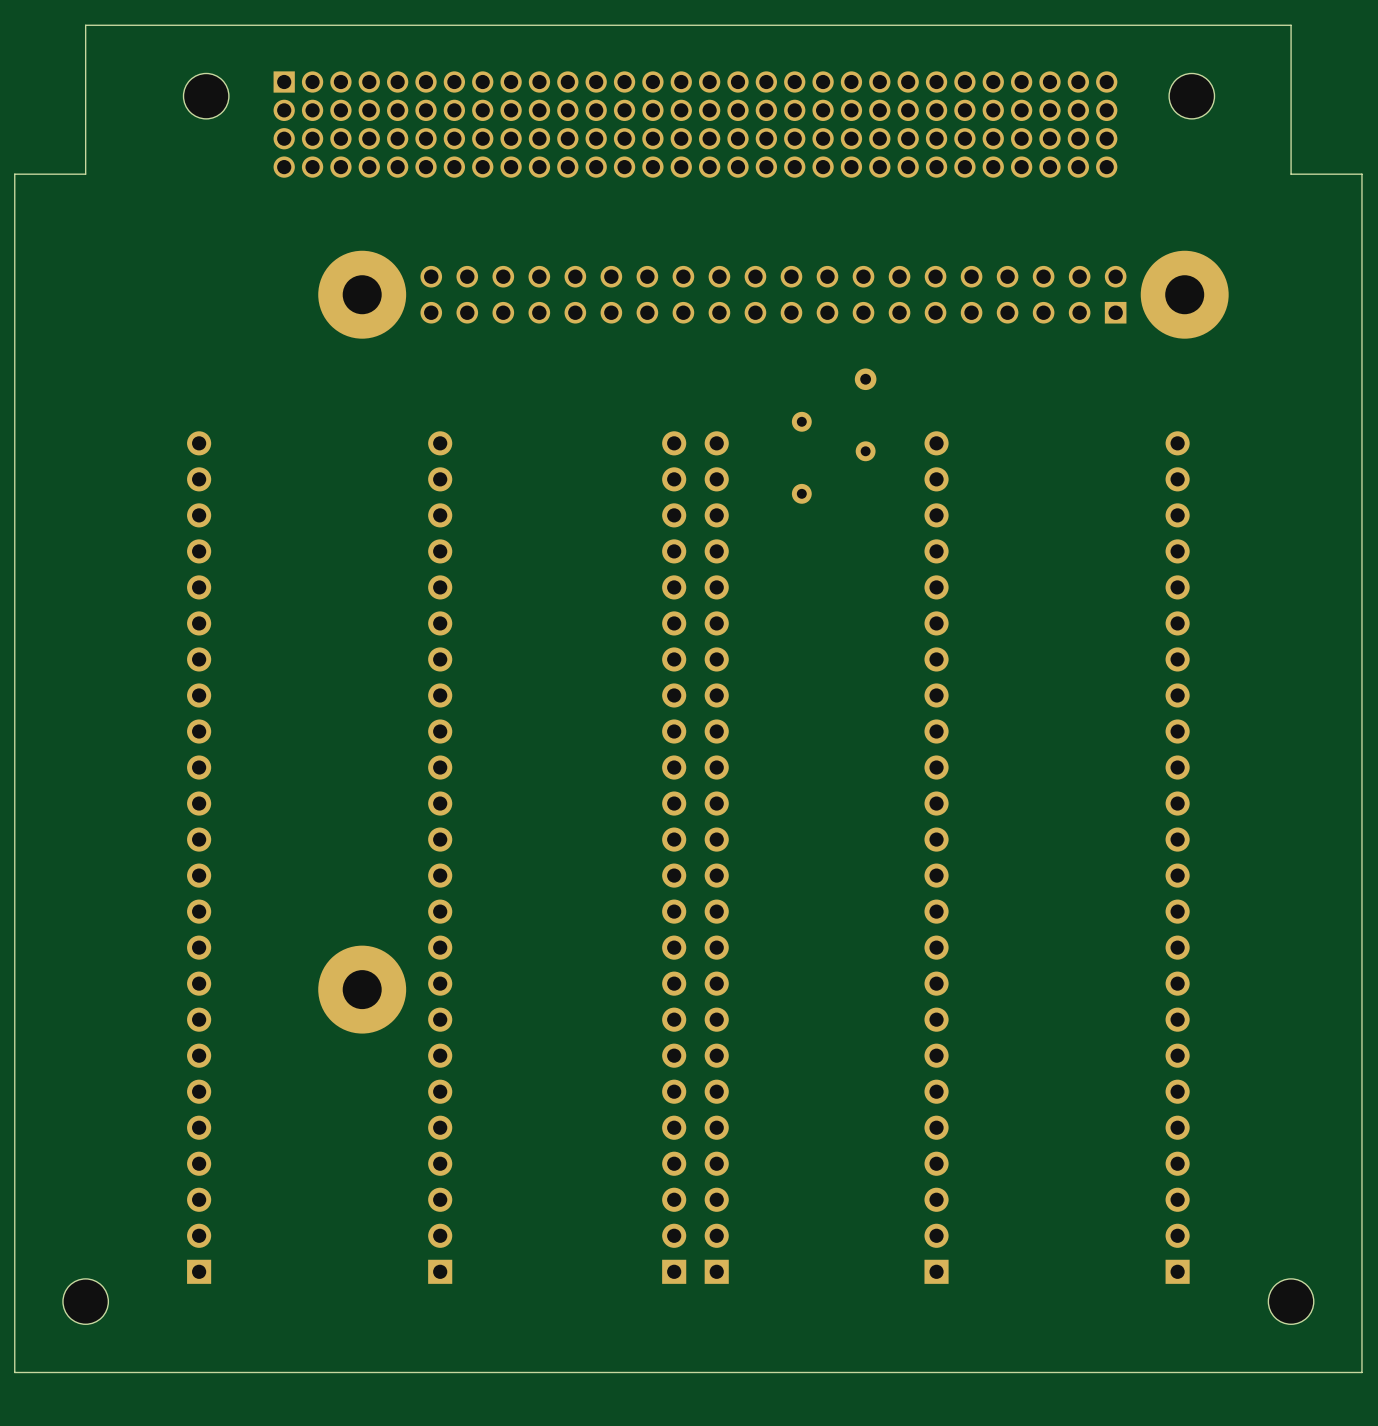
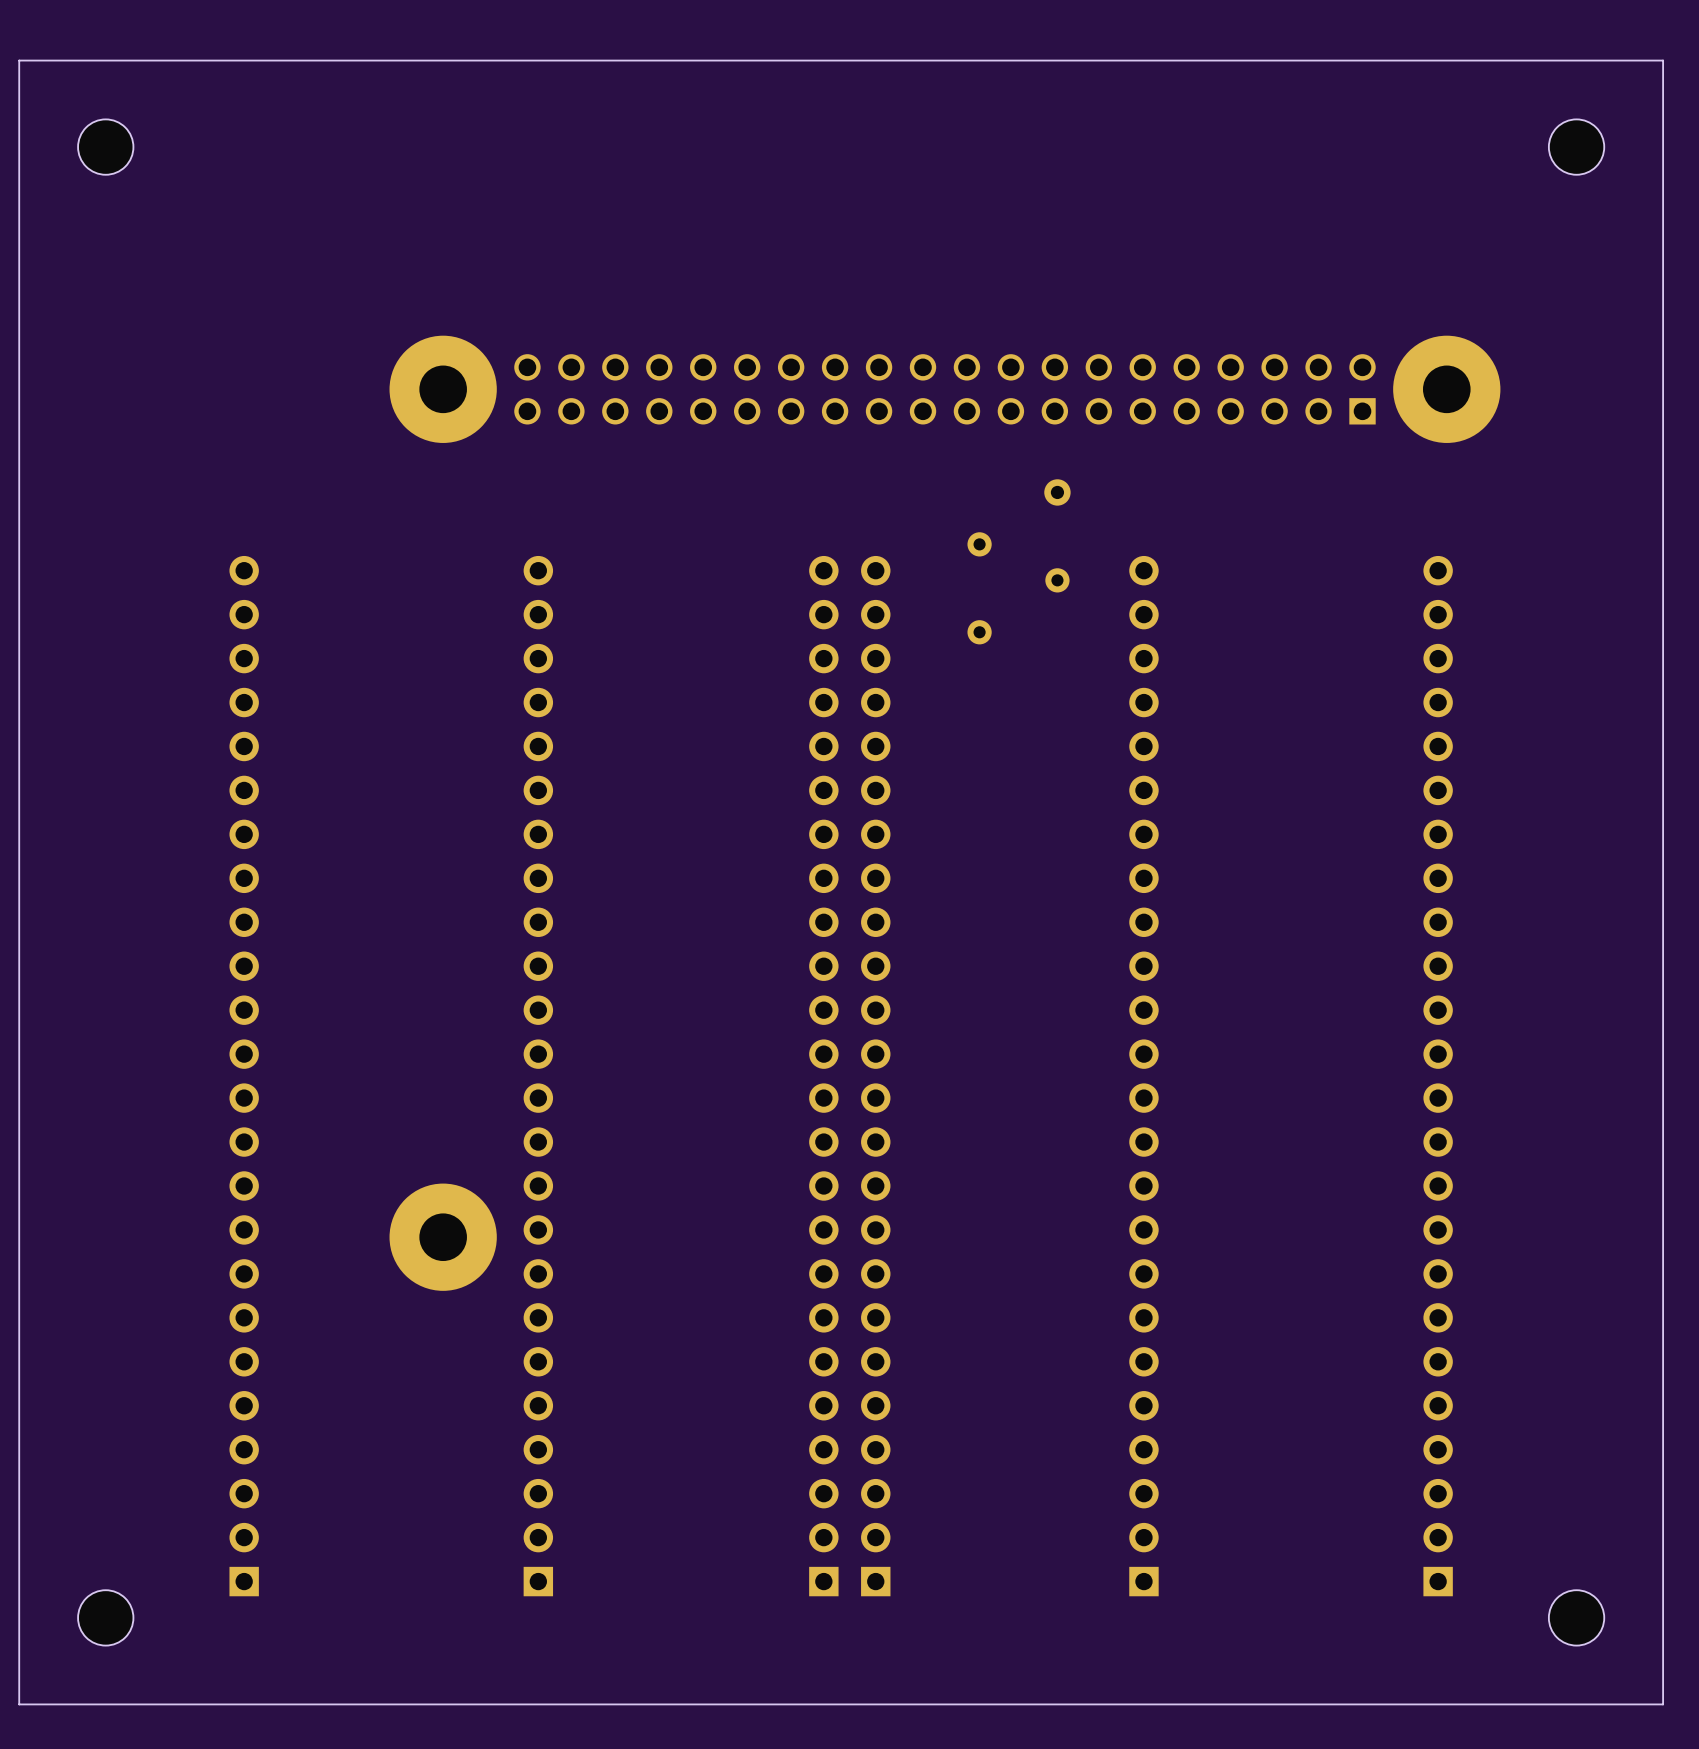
board edge: (85, 25) (85, 174) (14, 174) -> (105, 60) (19, 60) (19, 242)
board edge: (1291, 25) (1291, 174) (1361, 174) -> (1576, 60) (1663, 60) (1663, 242)
part position: (206, 96) -> (105, 147)
part position: (1191, 96) -> (1576, 147)
part: (695, 124) -> none

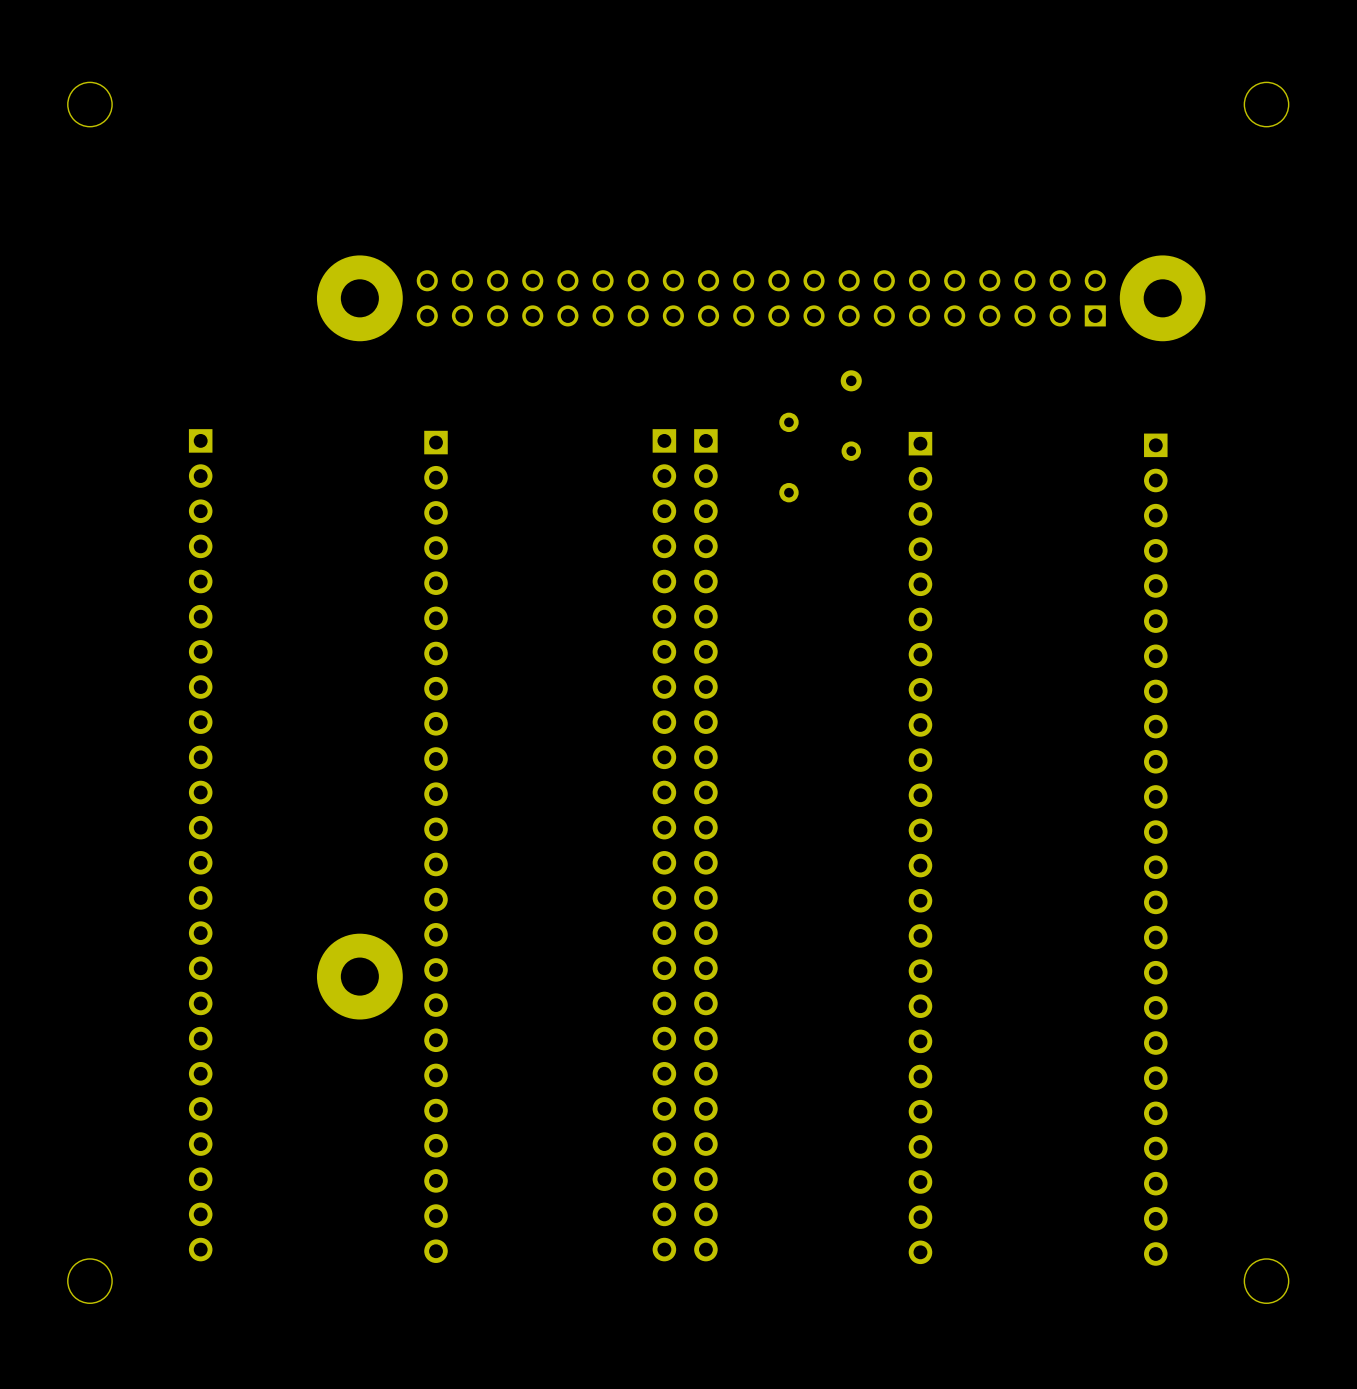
board edge: (1663, 60) (19, 60) (19, 1704) (1663, 1704) (1663, 60) -> none
part rotation: 0° (244, 1076) -> 180° (200, 845)
part rotation: 0° (538, 1076) -> 180° (436, 846)
part rotation: 0° (823, 1076) -> 180° (664, 845)
part rotation: 0° (875, 1076) -> 180° (705, 845)
part rotation: 0° (1143, 1076) -> 180° (920, 848)
part rotation: 0° (1438, 1076) -> 180° (1155, 849)

